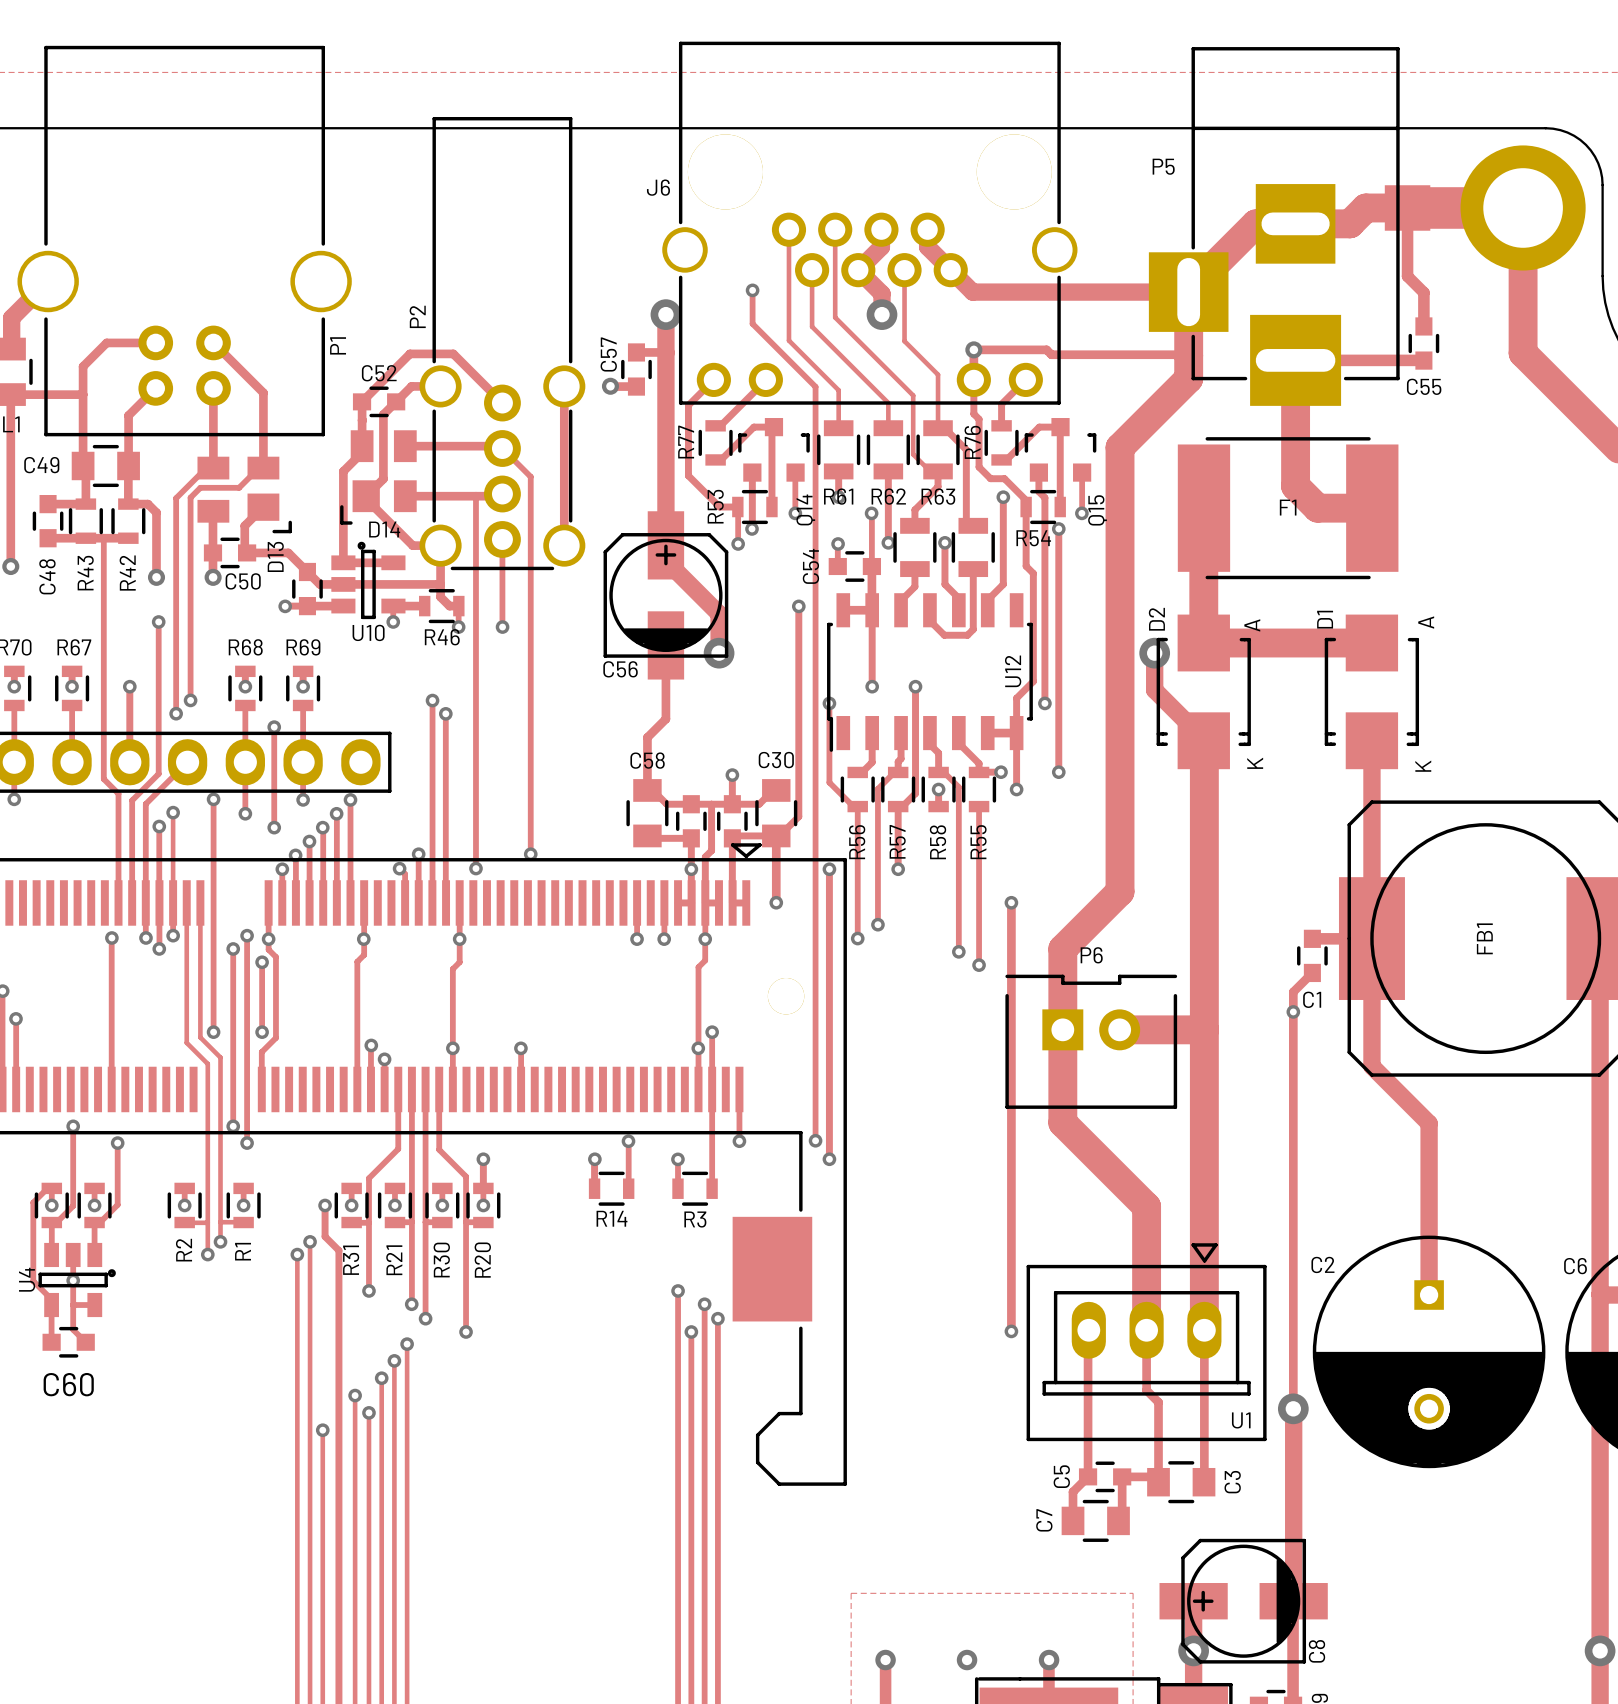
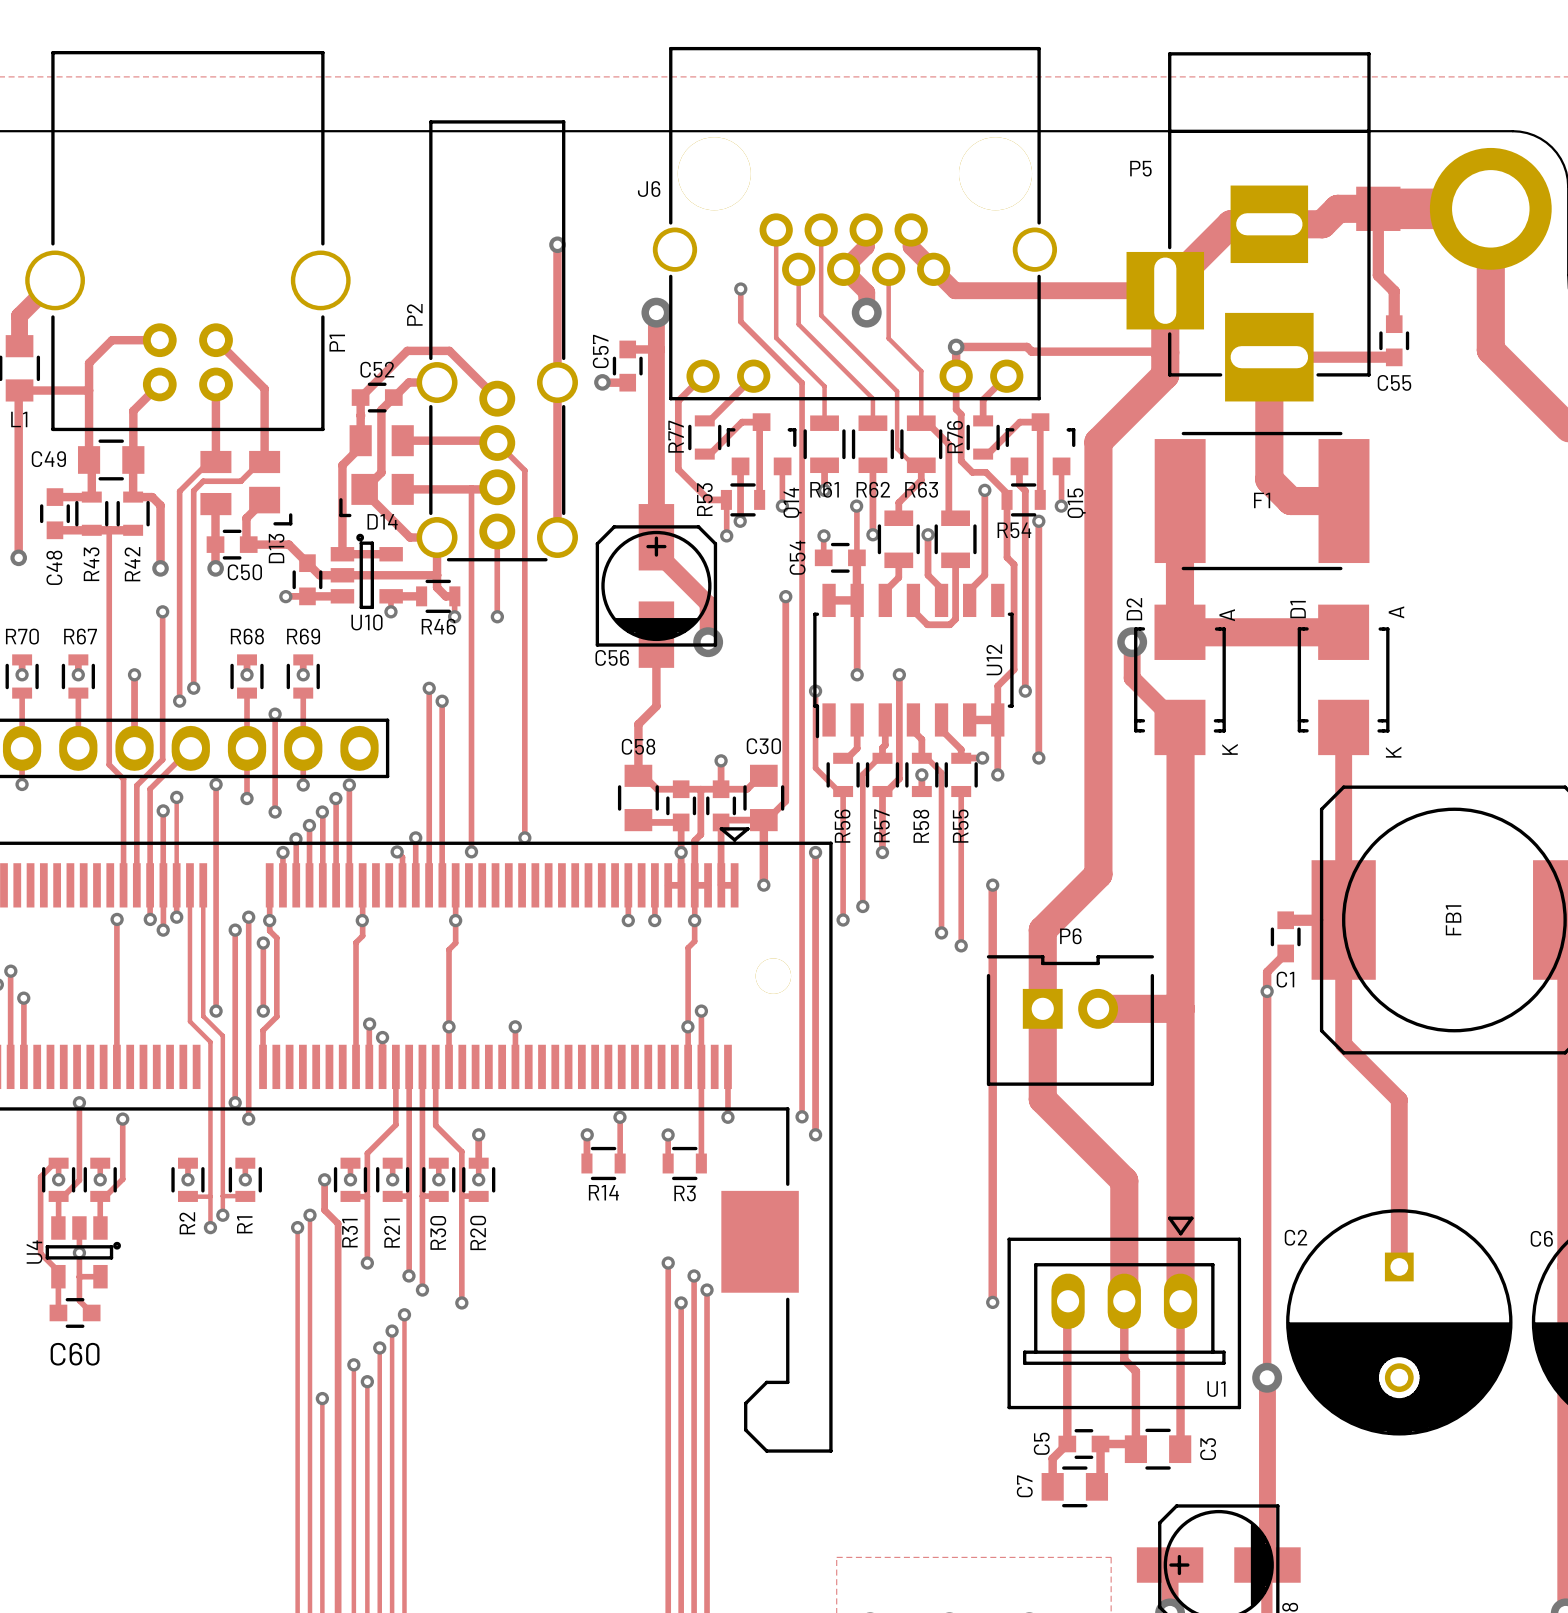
track: none -> (557, 244) (557, 382)
via: none -> (557, 244)

